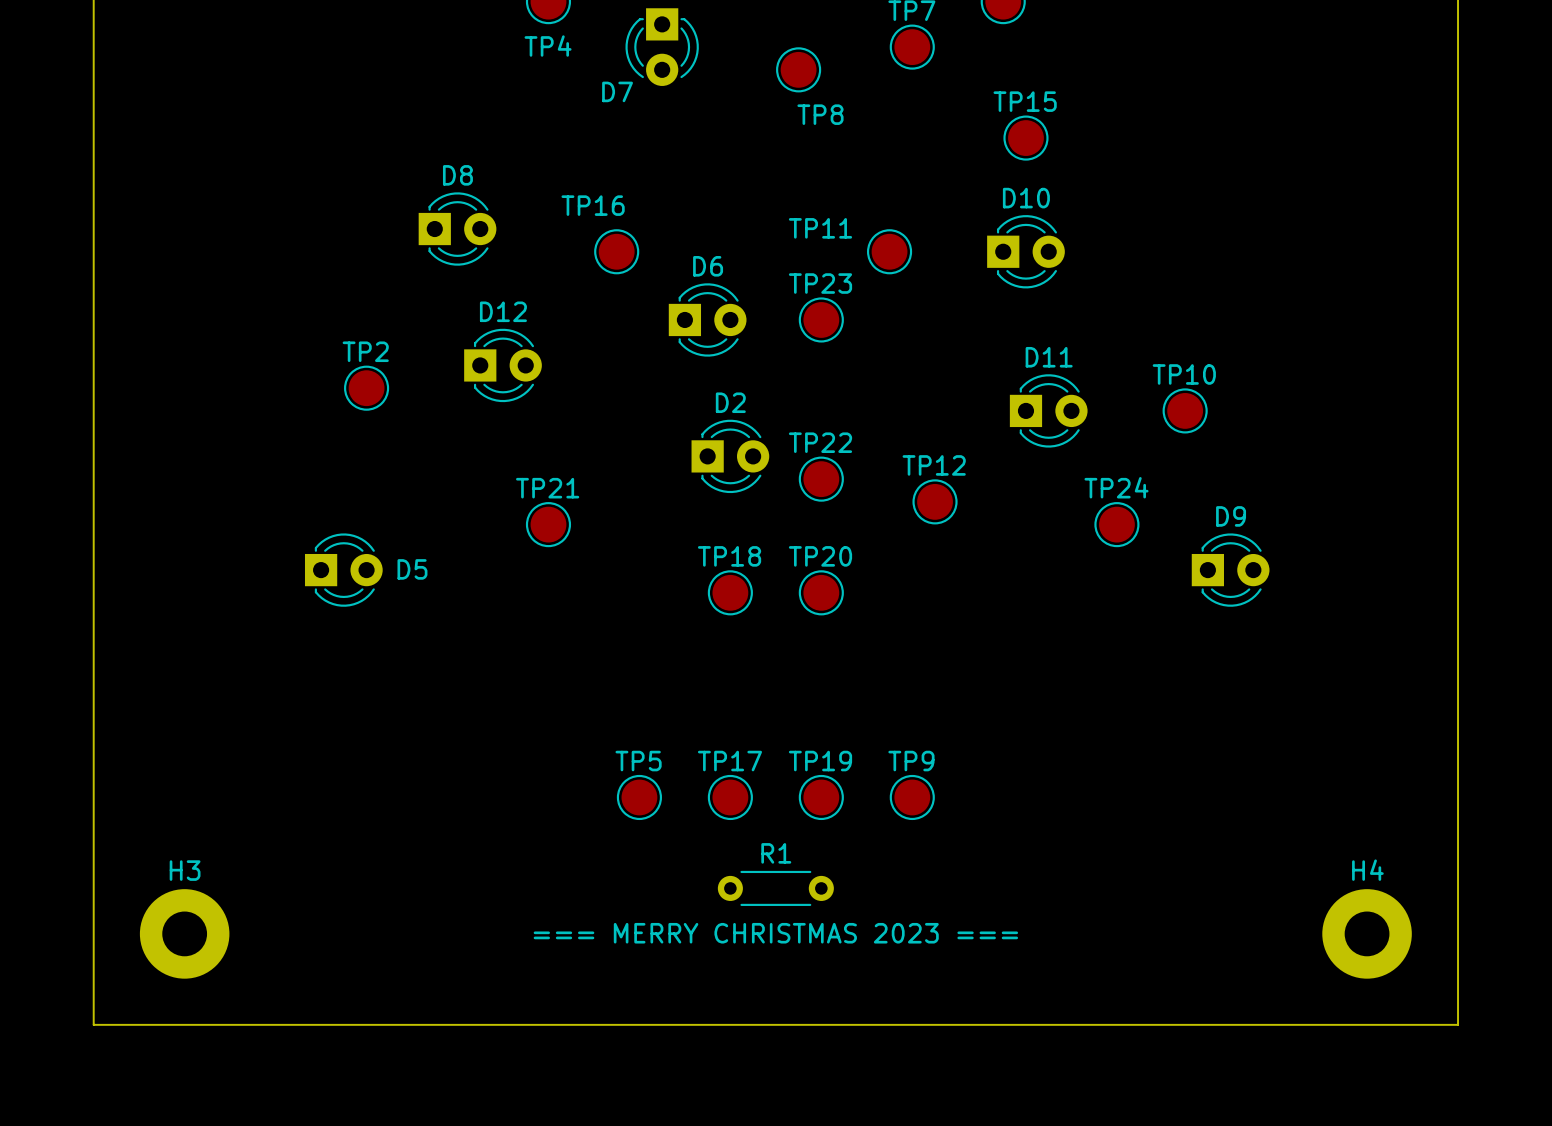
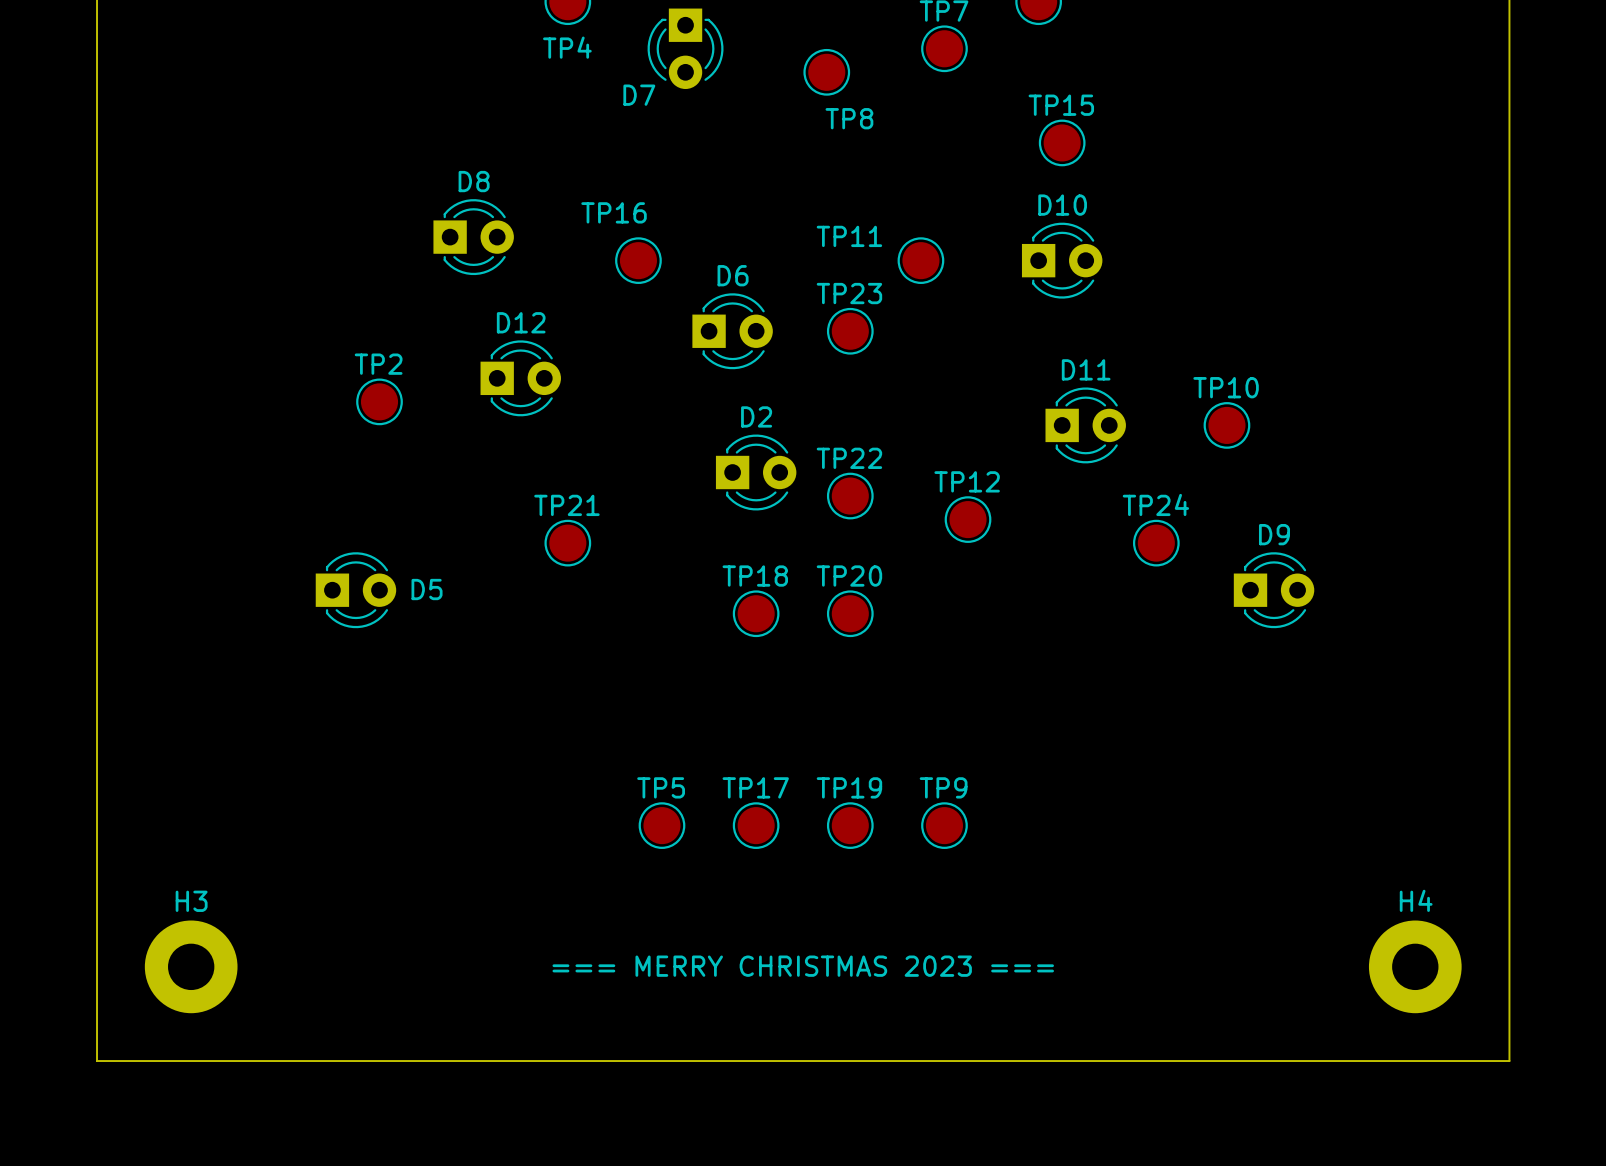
R1: (775, 888) -> none

